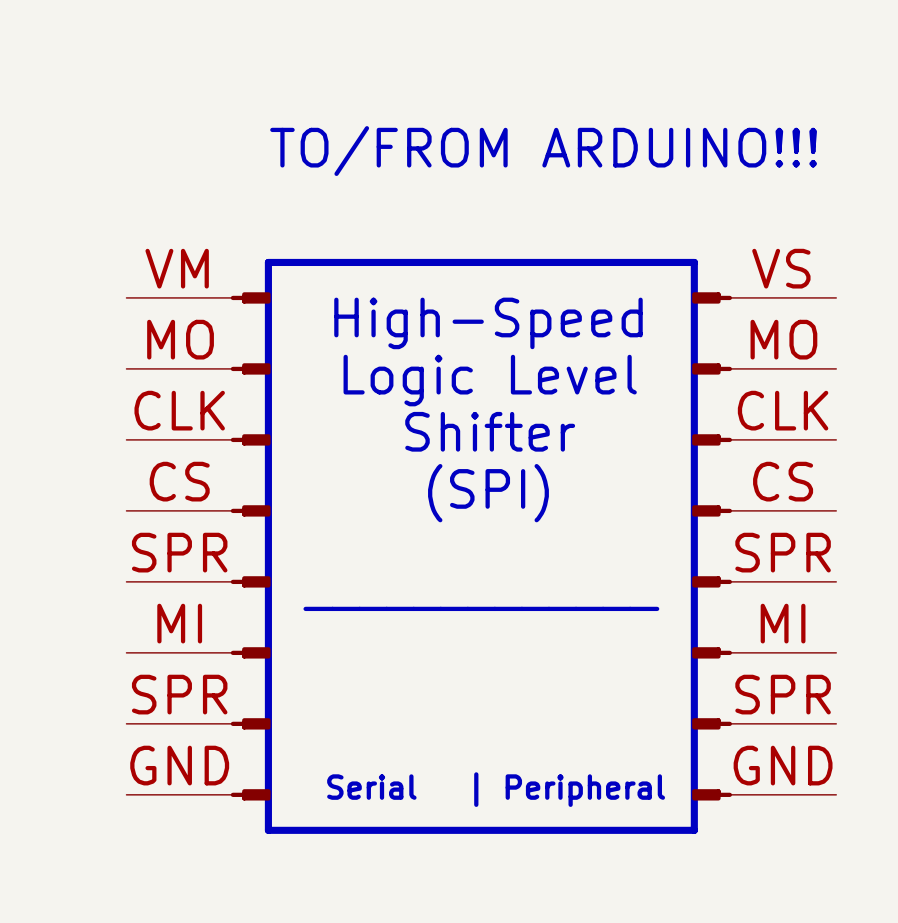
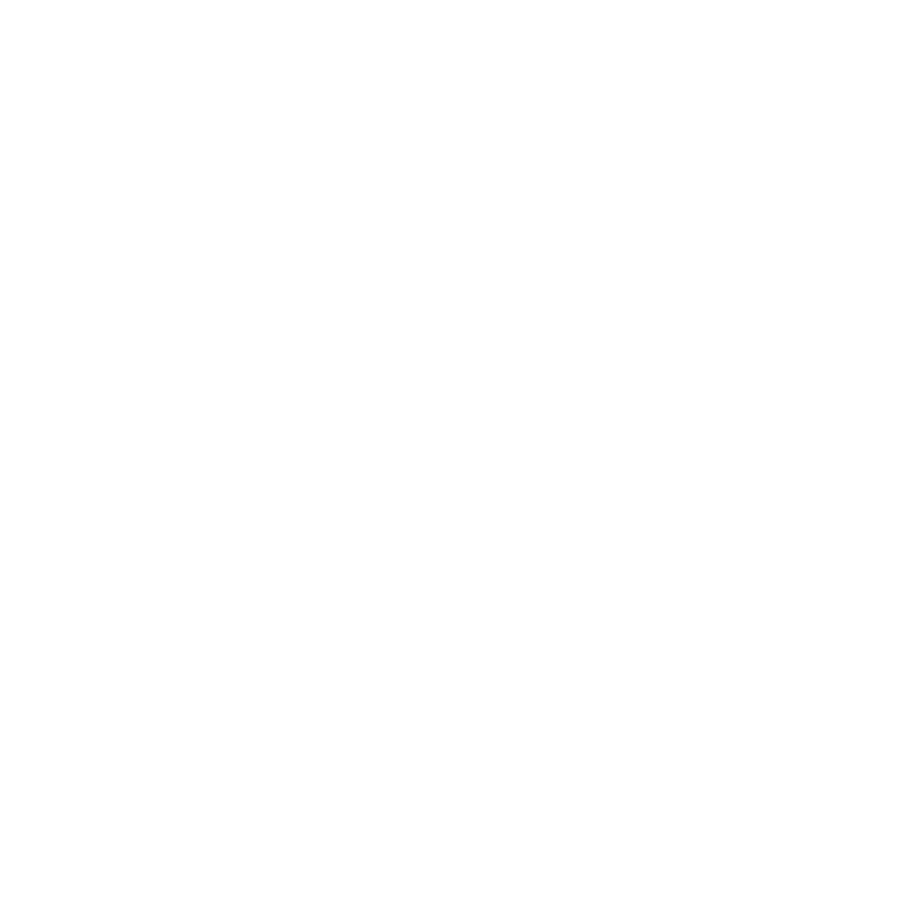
text: TO/FROM ARDUINO!!! (543, 151) -> none
line: (268, 262) (694, 262) (694, 830) (268, 830) (268, 262) -> none
text: High-Speed (488, 323) -> none
text: Logic Level (490, 380) -> none
text: Shifter (490, 431) -> none
text: (SPI) (488, 493) -> none
part: (198, 546) -> none
part: (764, 546) -> none
text: _____________ (481, 608) -> none
text: Serial | Peripheral (496, 789) -> none

